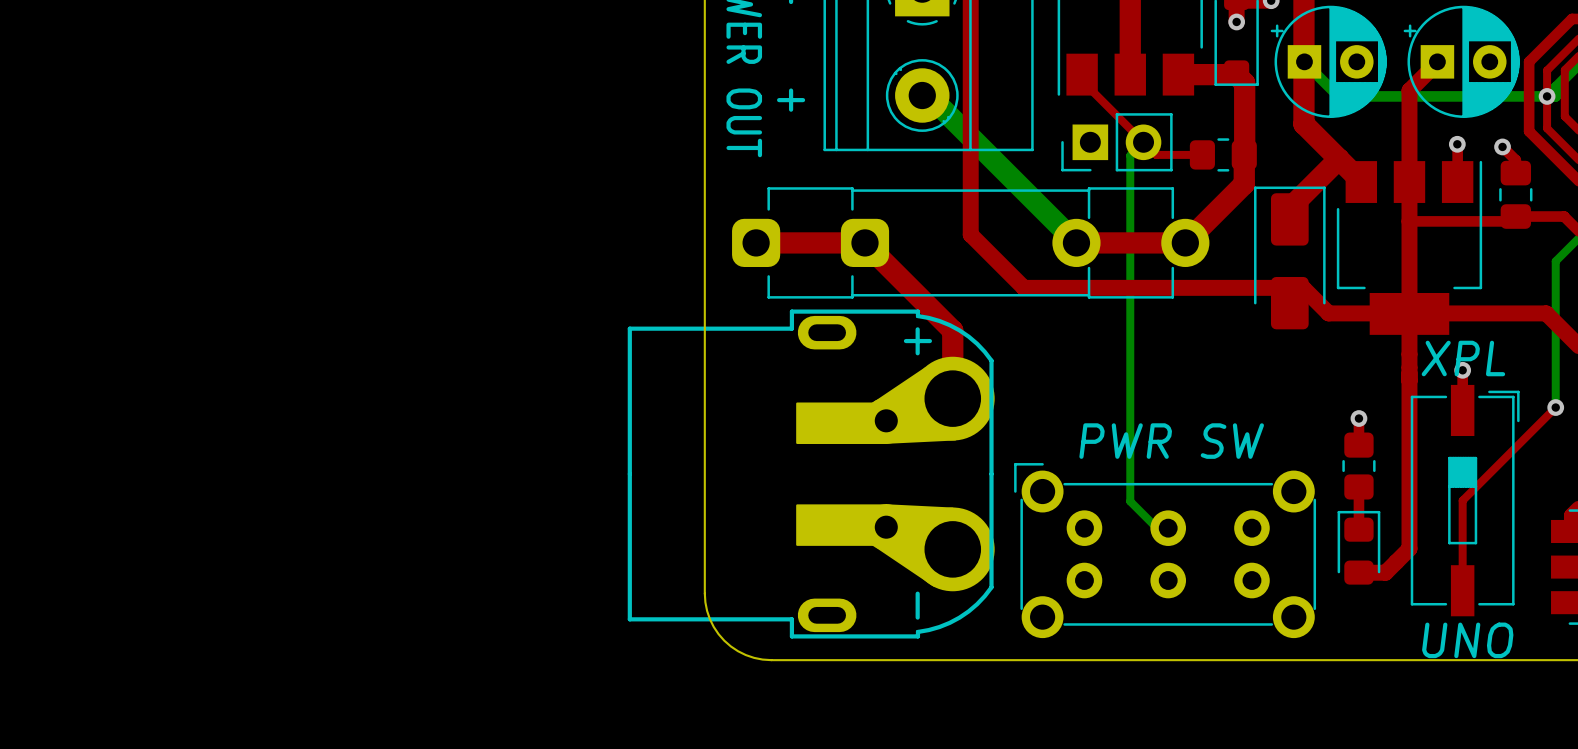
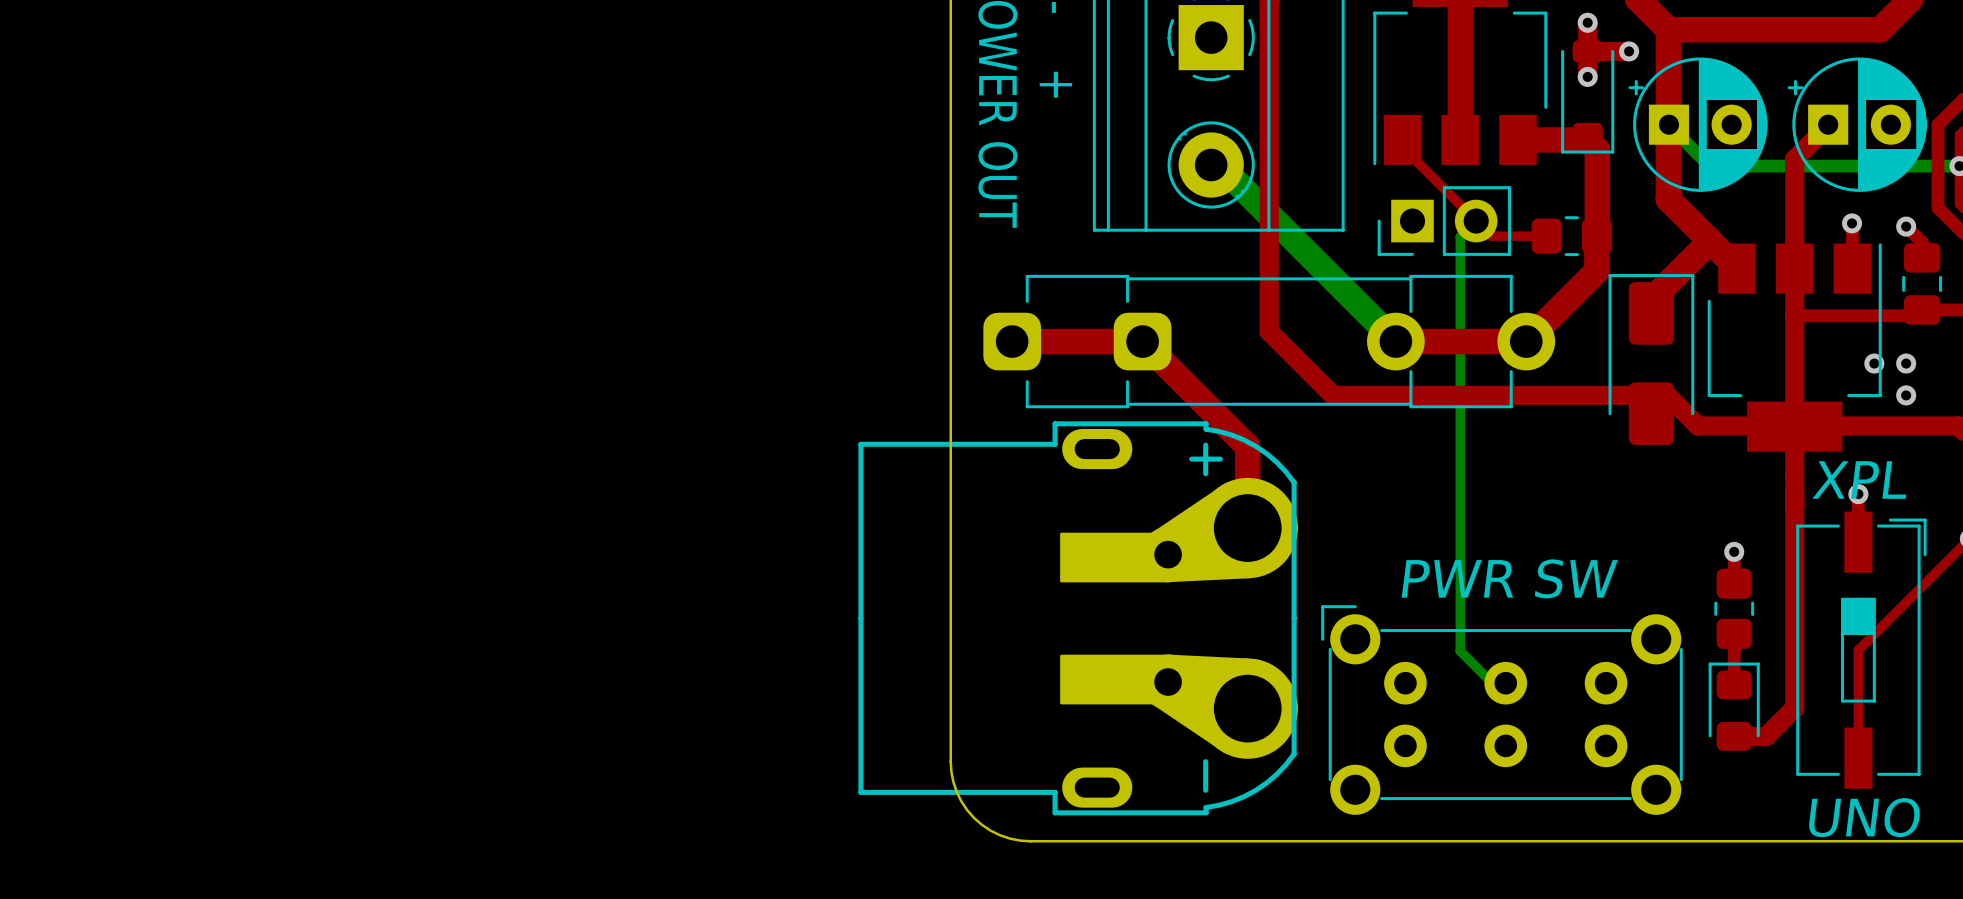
via: none -> (1874, 363)
via: none -> (1906, 363)
via: none -> (1906, 395)

